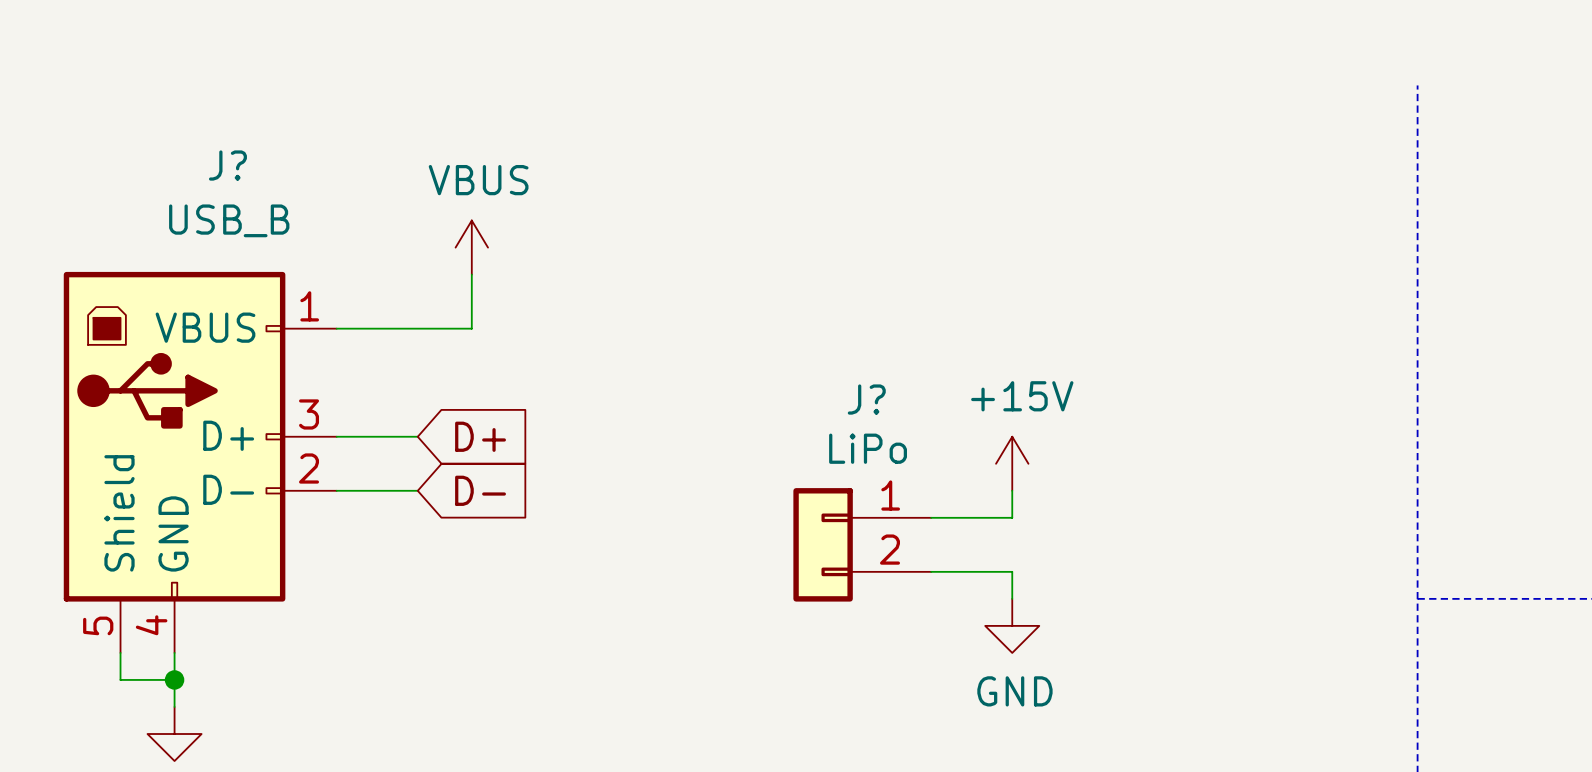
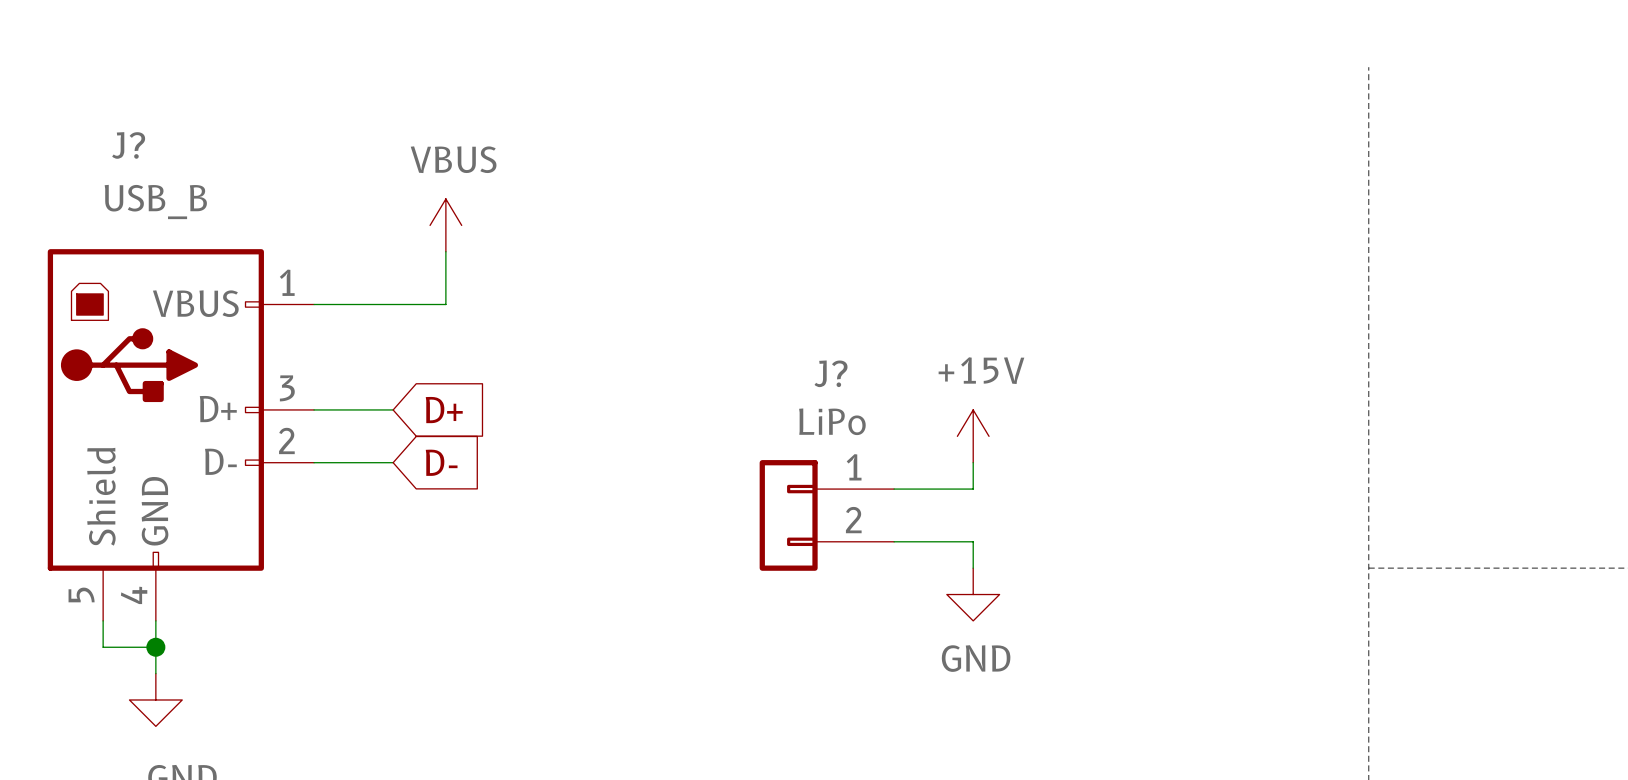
J? name position: J? (227, 165) -> J? (128, 145)
J? value position: USB_B (229, 220) -> USB_B (155, 201)

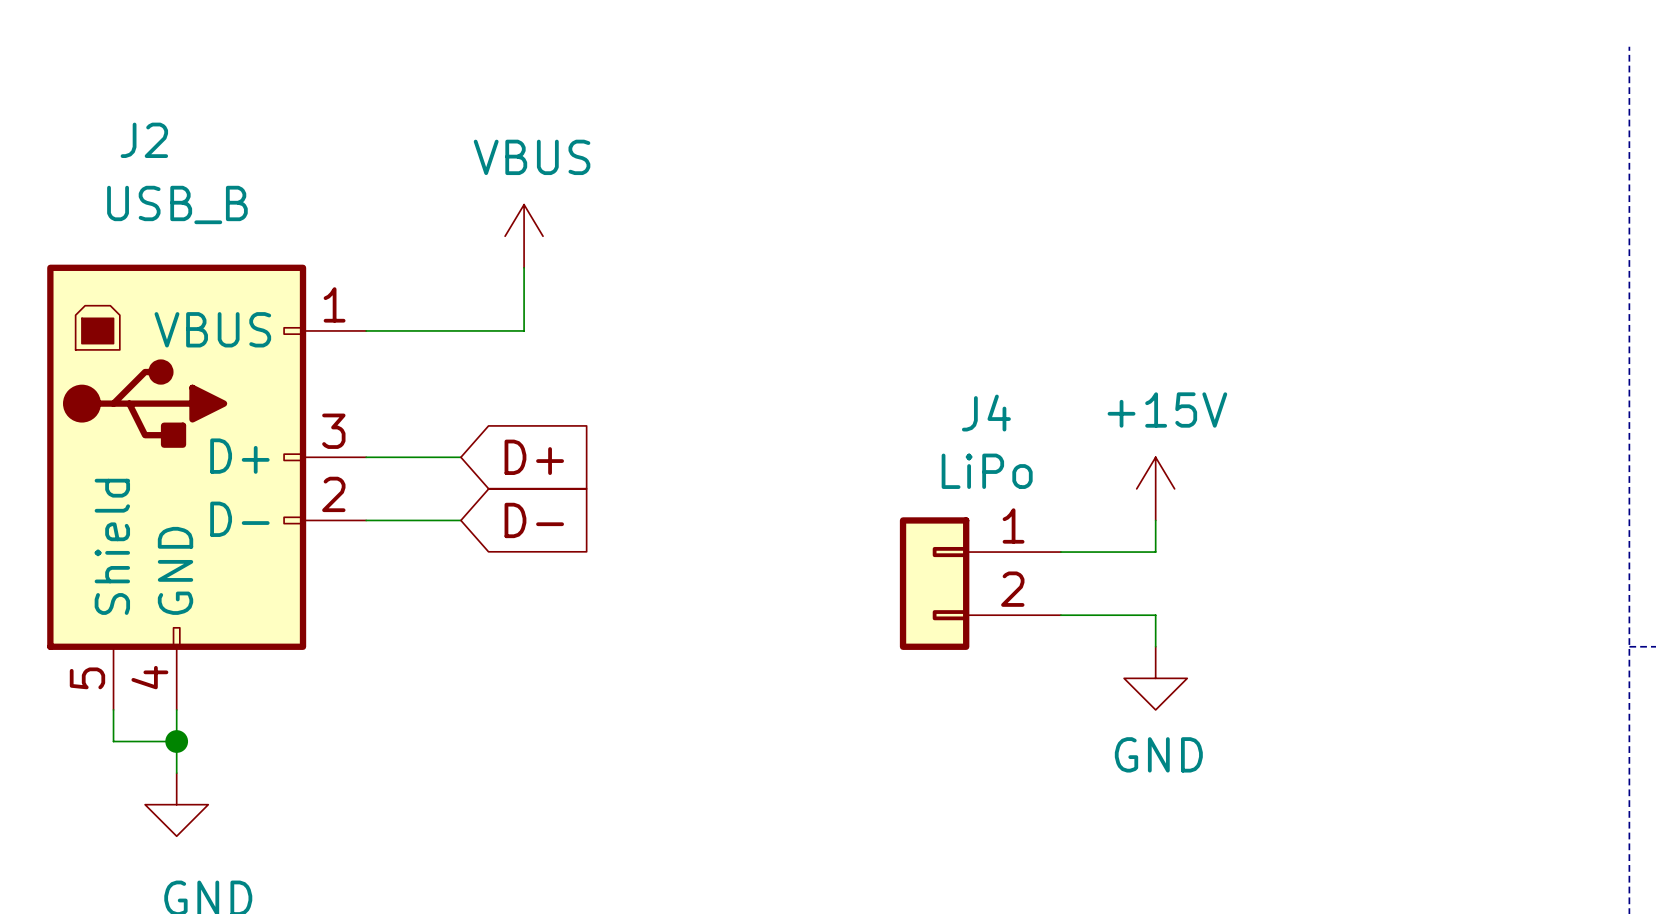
J? name: J? (128, 145) -> J2 (144, 140)
J? name: J? (831, 373) -> J4 (986, 413)

